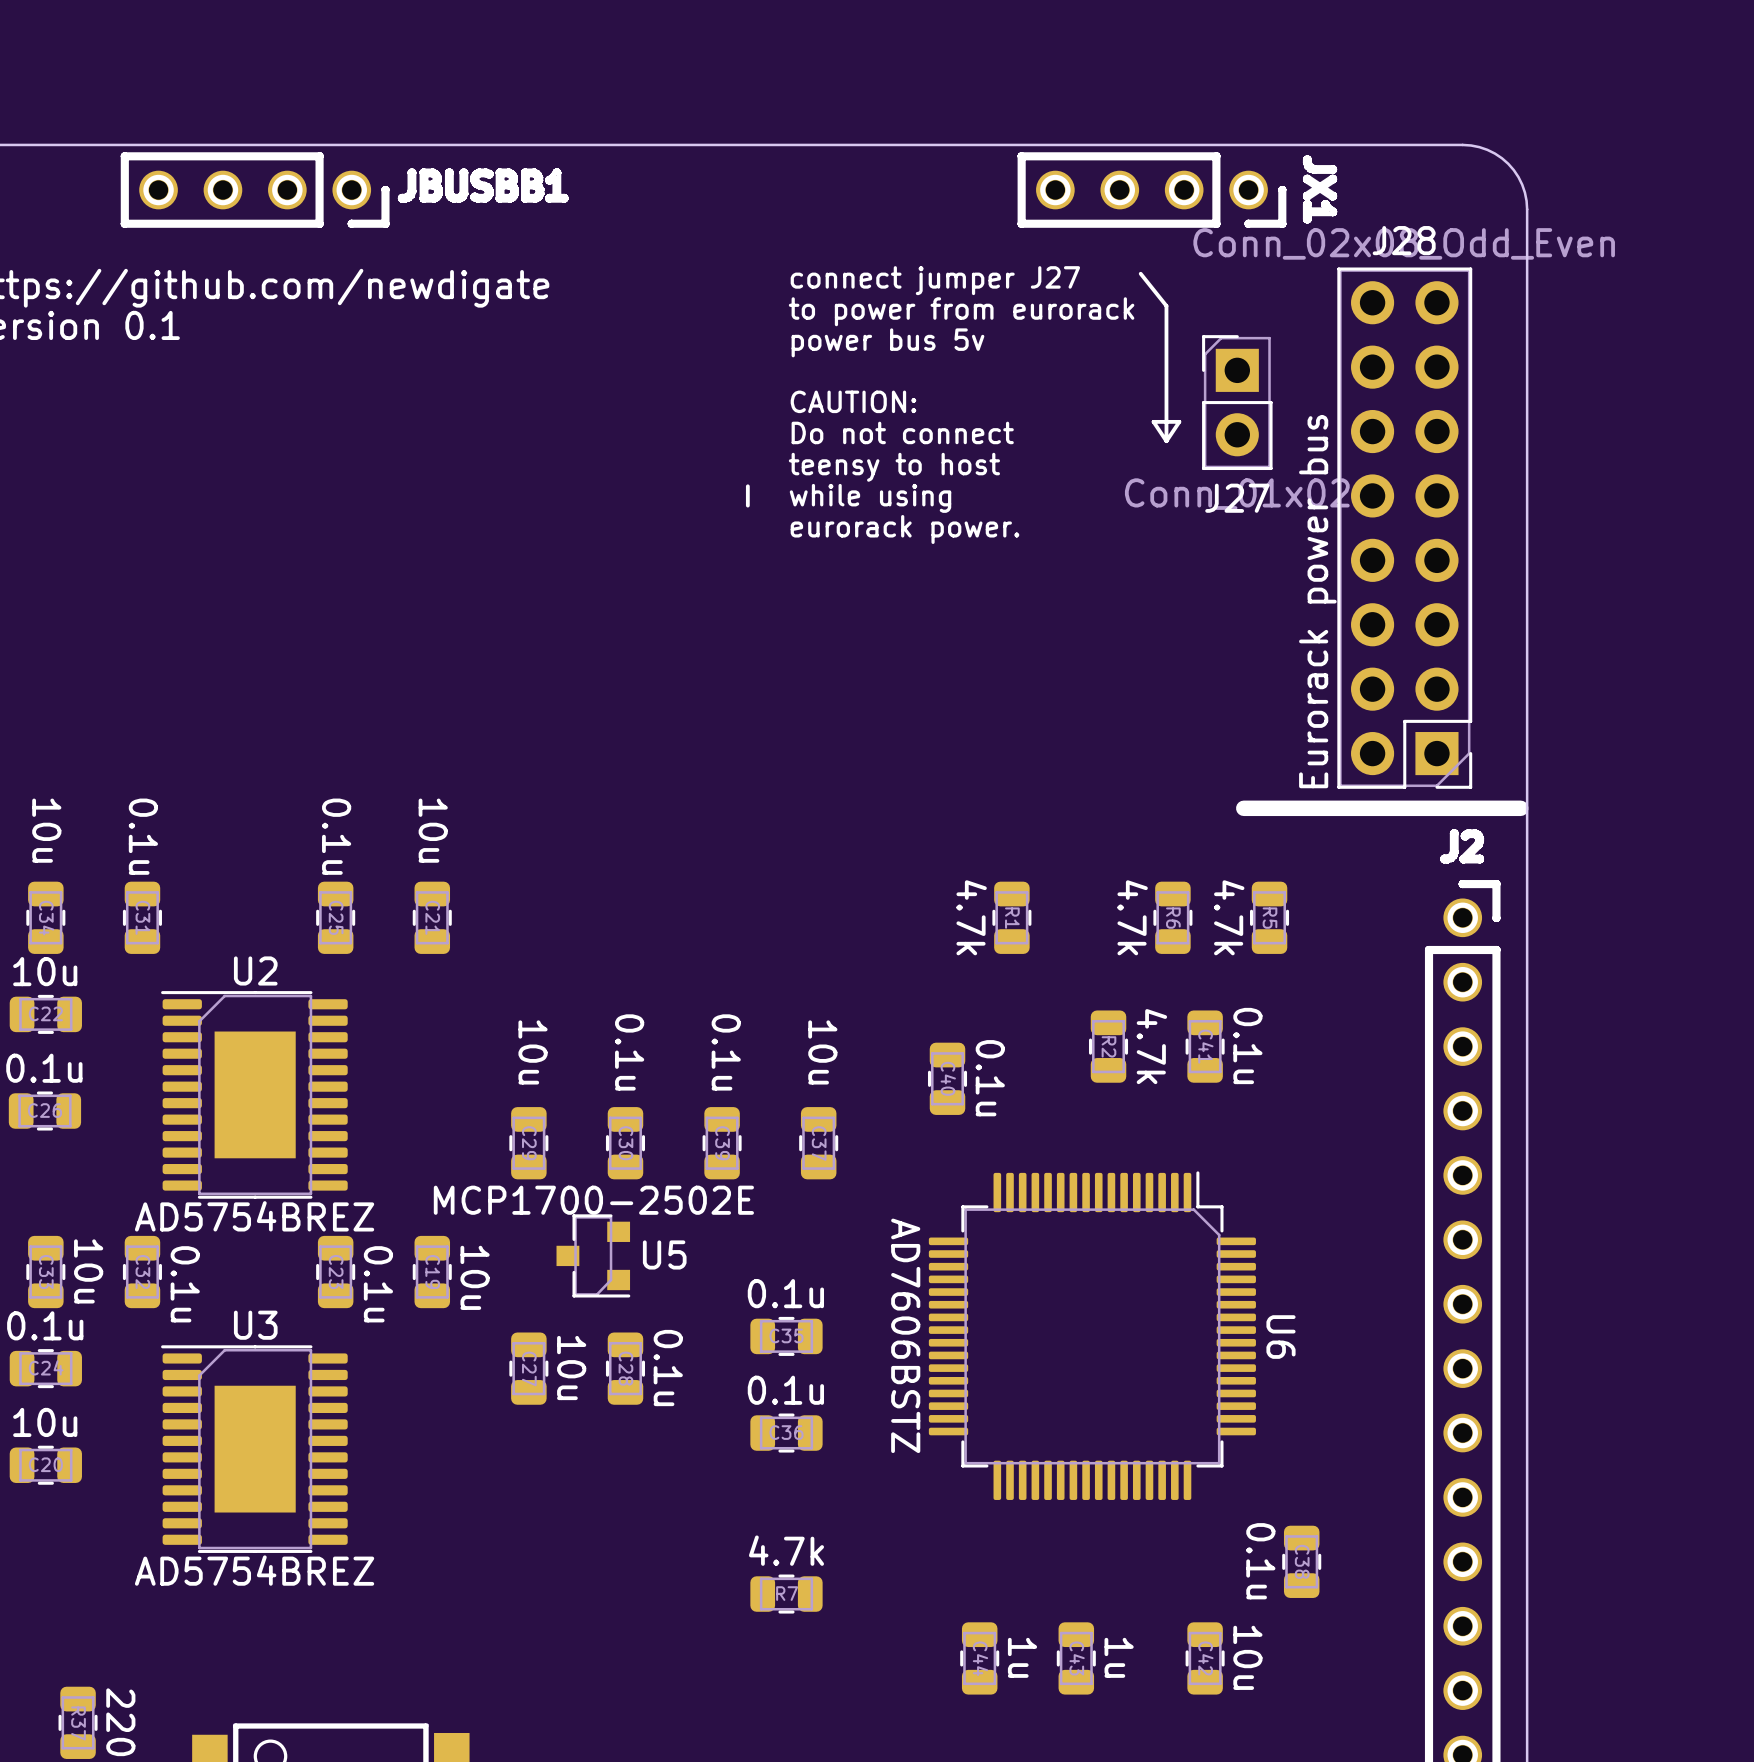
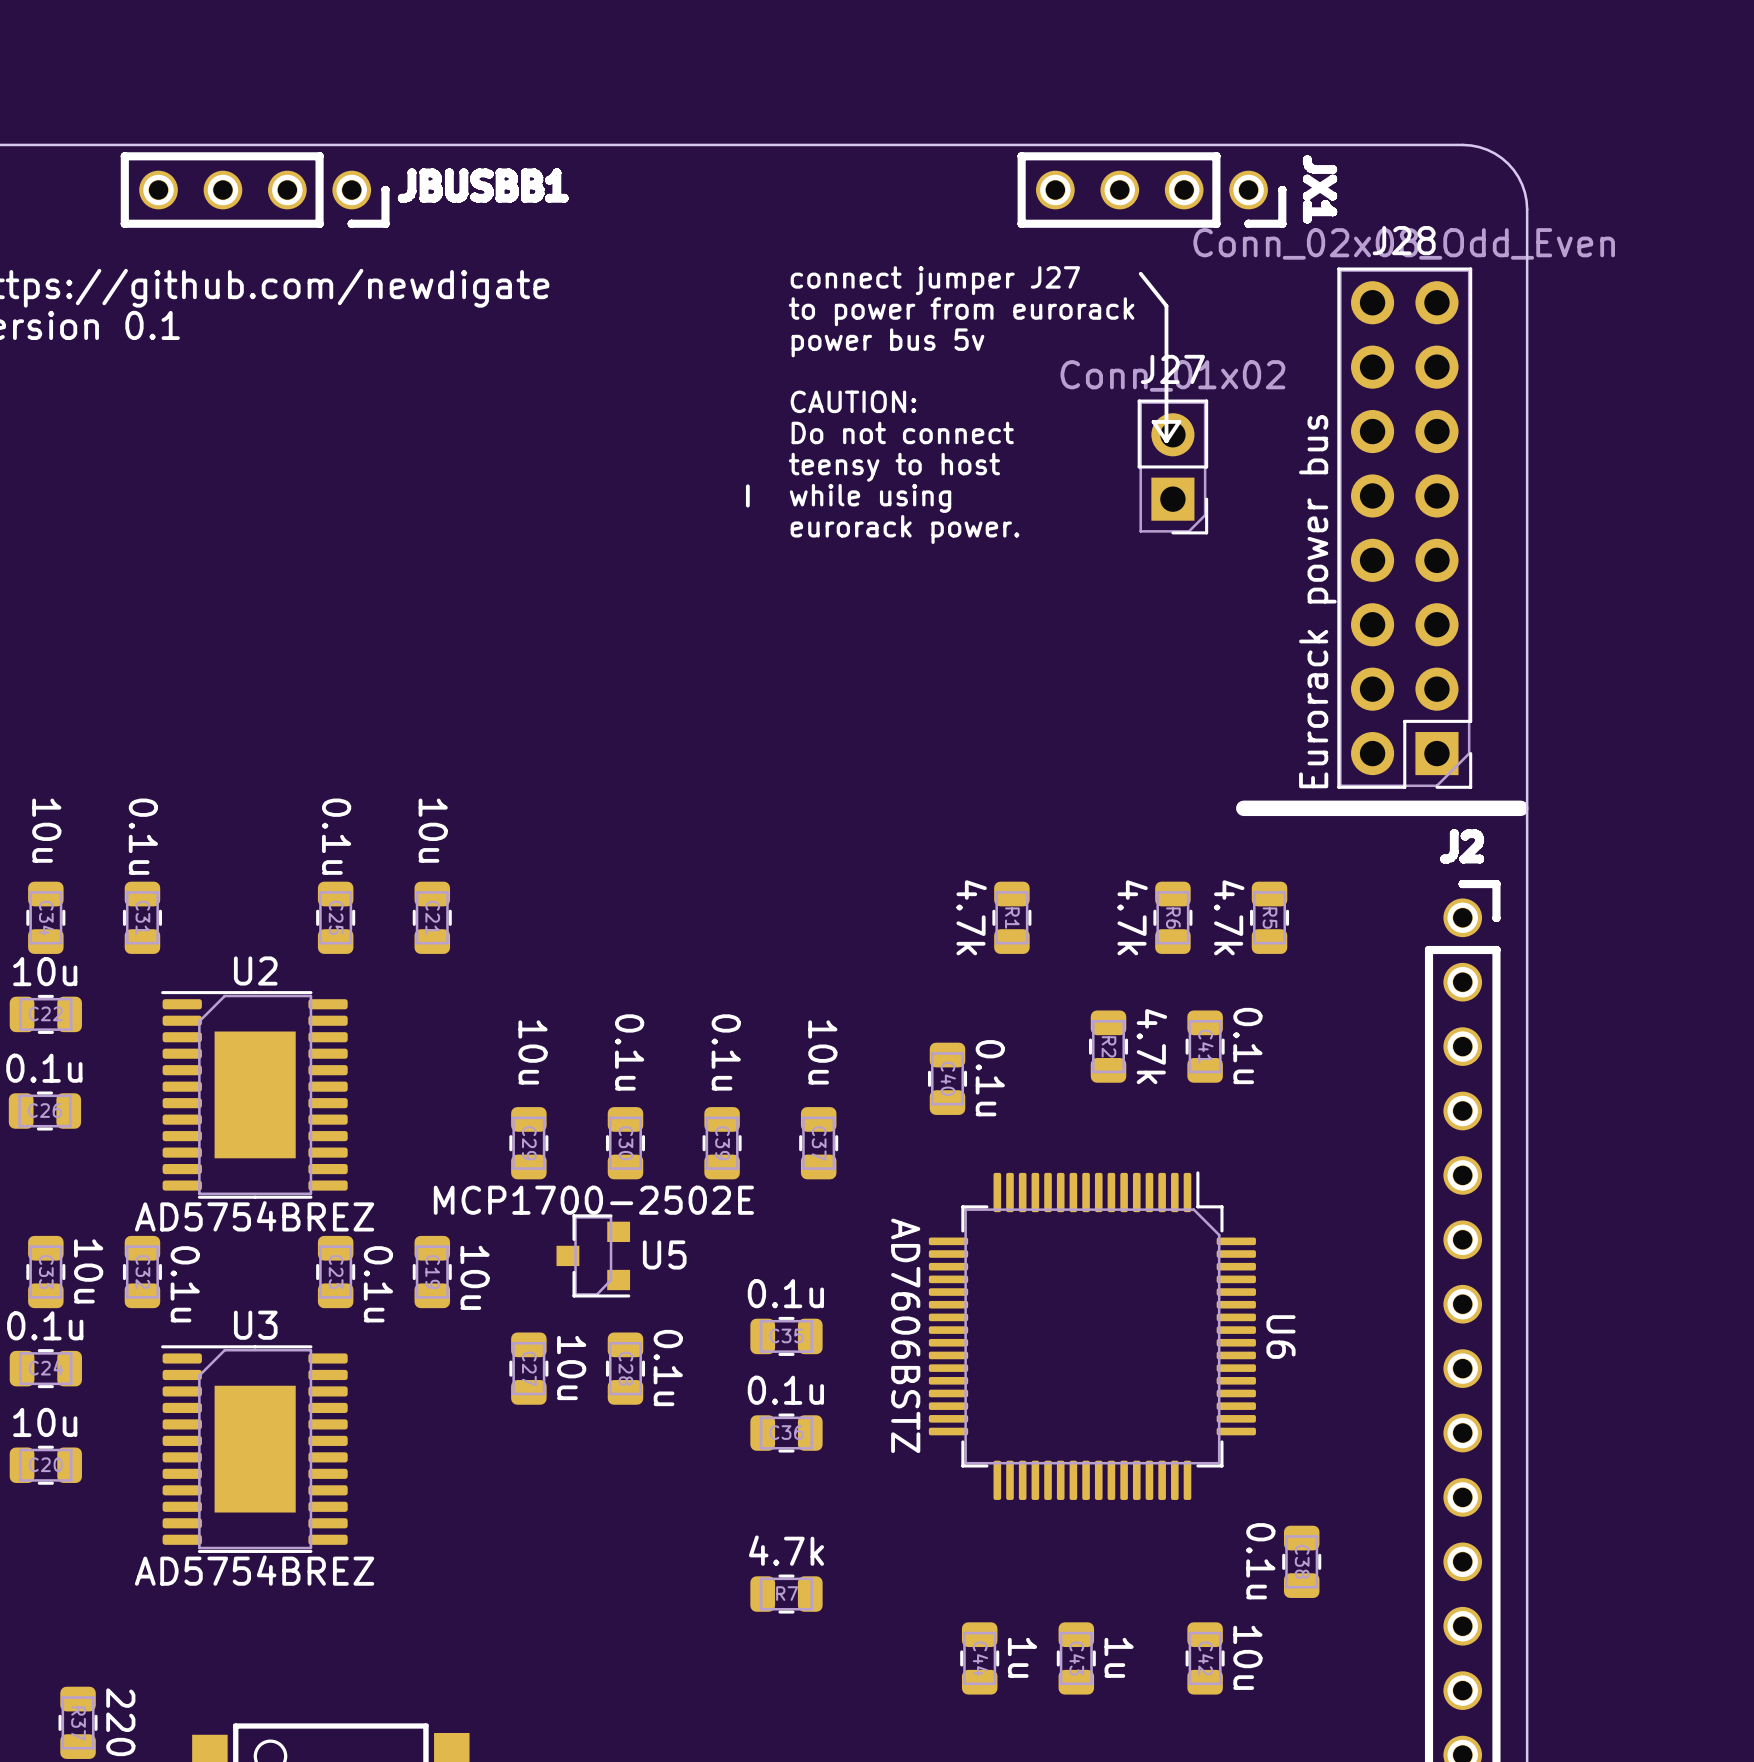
J27 rotation: 0° (1237, 402) -> 180° (1172, 466)
J27 position: (1237, 402) -> (1172, 466)

